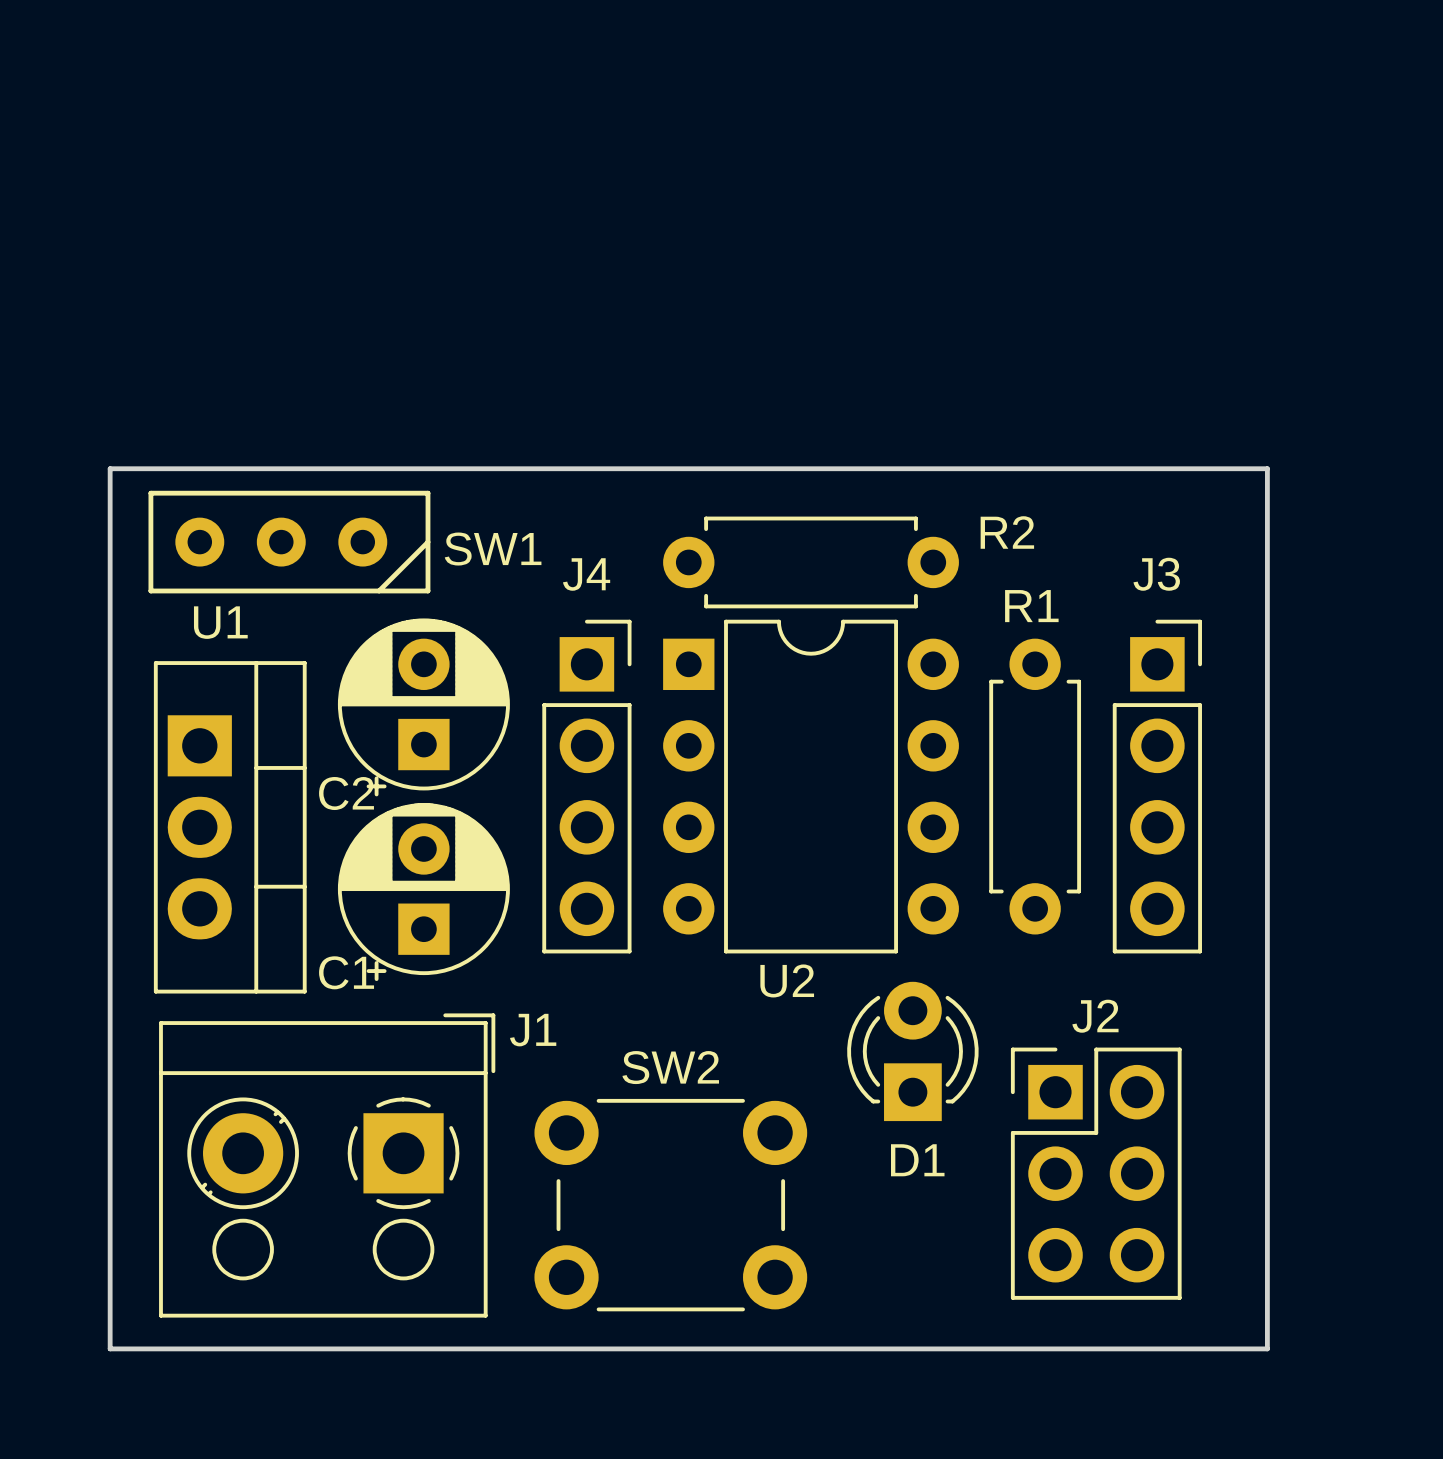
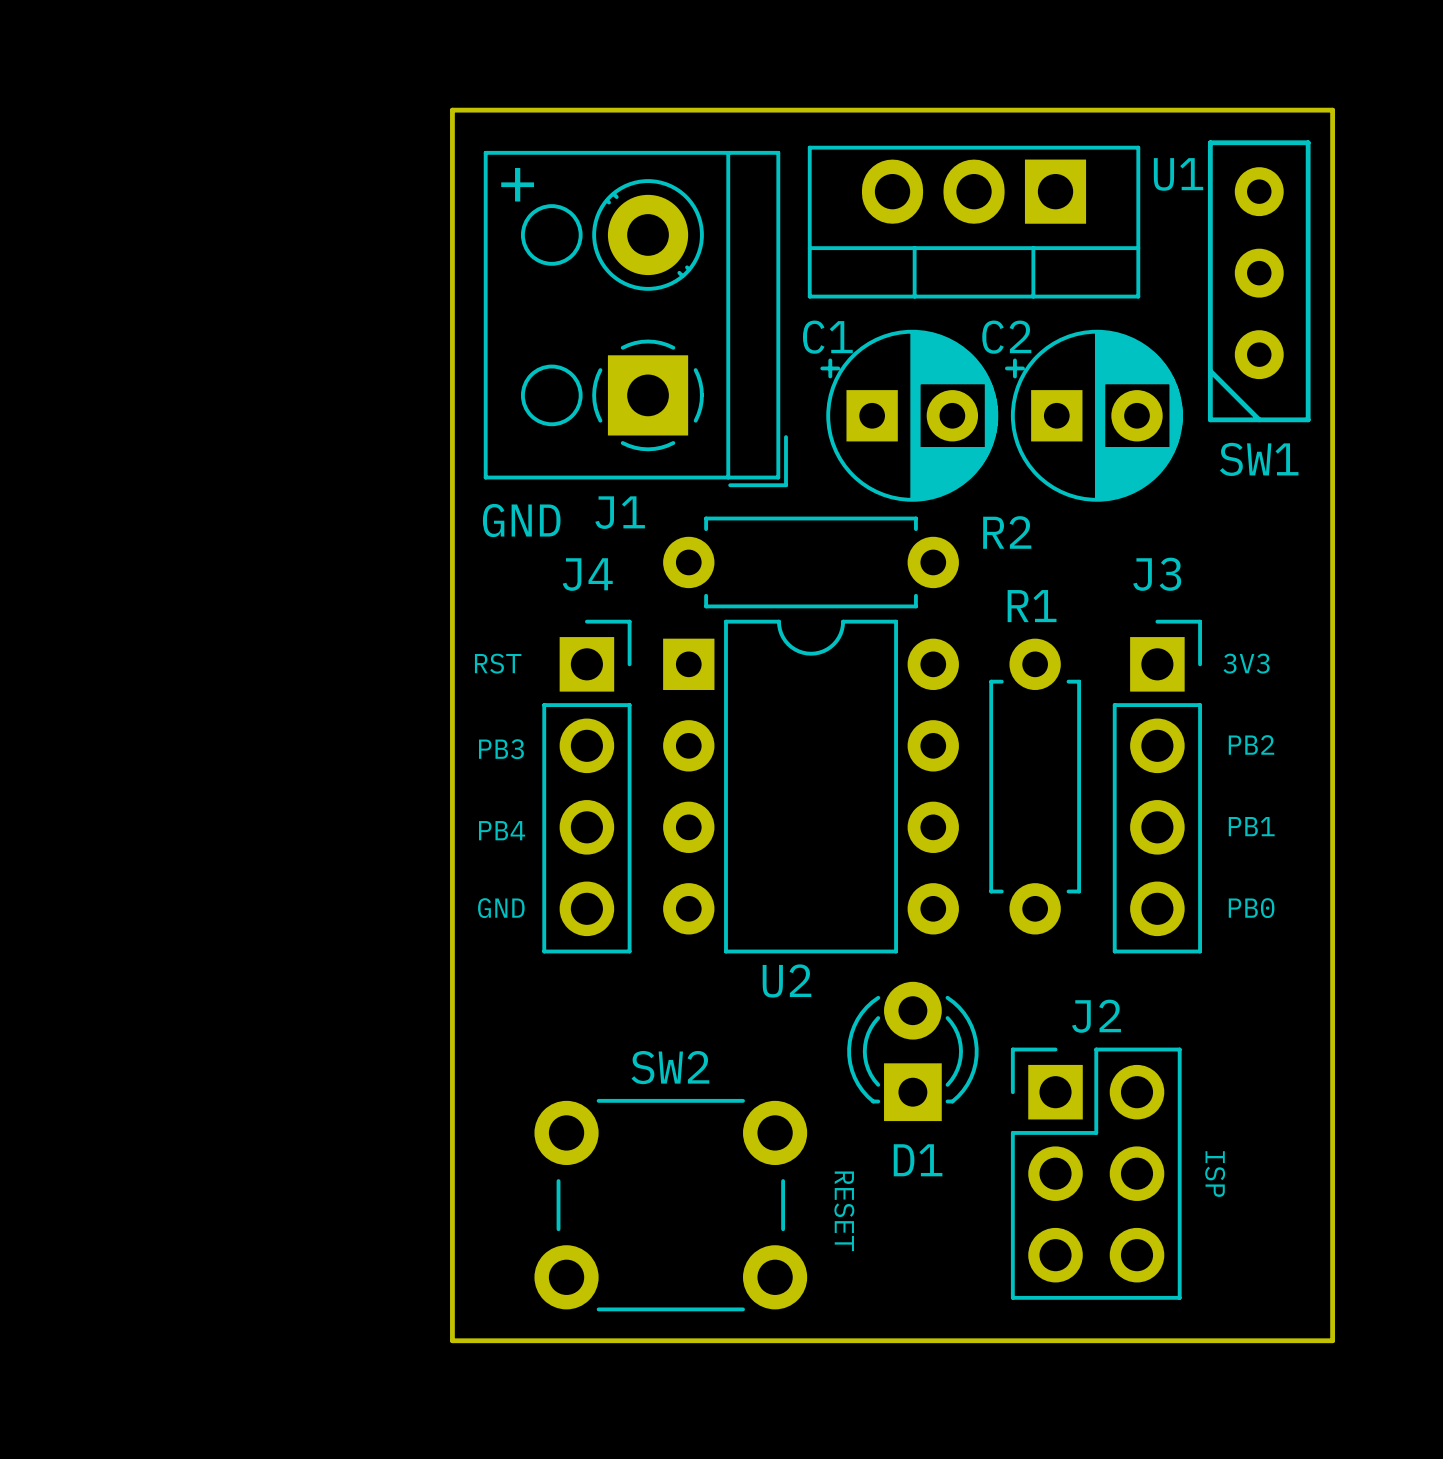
text: none -> + (517, 184)
board edge: (110, 468) (110, 1348) (1267, 1348) (1267, 468) (110, 468) -> (452, 110) (452, 1340) (1332, 1340) (1332, 110) (452, 110)
text: none -> GND (521, 520)
SW1 rotation: 0° (289, 542) -> 90° clockwise (1259, 281)
SW1 position: (289, 542) -> (1259, 281)
text: none -> RST (498, 663)
text: none -> 3V3 (1246, 663)
C2 rotation: 0° (423, 707) -> 90° clockwise (1093, 415)
C2 position: (423, 707) -> (1093, 415)
text: none -> PB2 (1251, 744)
text: none -> PB3 (501, 749)
text: none -> PB1 (1251, 826)
U1 rotation: 0° (230, 827) -> 90° clockwise (974, 222)
U1 position: (230, 827) -> (974, 222)
text: none -> PB4 (502, 830)
C1 rotation: 0° (423, 892) -> 90° clockwise (909, 415)
C1 position: (423, 892) -> (909, 415)
text: none -> GND (501, 908)
text: none -> PB0 (1251, 908)
J1 name position: J1 (533, 1030) -> J1 (620, 512)
J1 rotation: 0° (327, 1165) -> 90° clockwise (635, 319)
J1 position: (327, 1165) -> (635, 319)
text: none -> ISP (1215, 1174)
text: none -> RESET (844, 1211)

